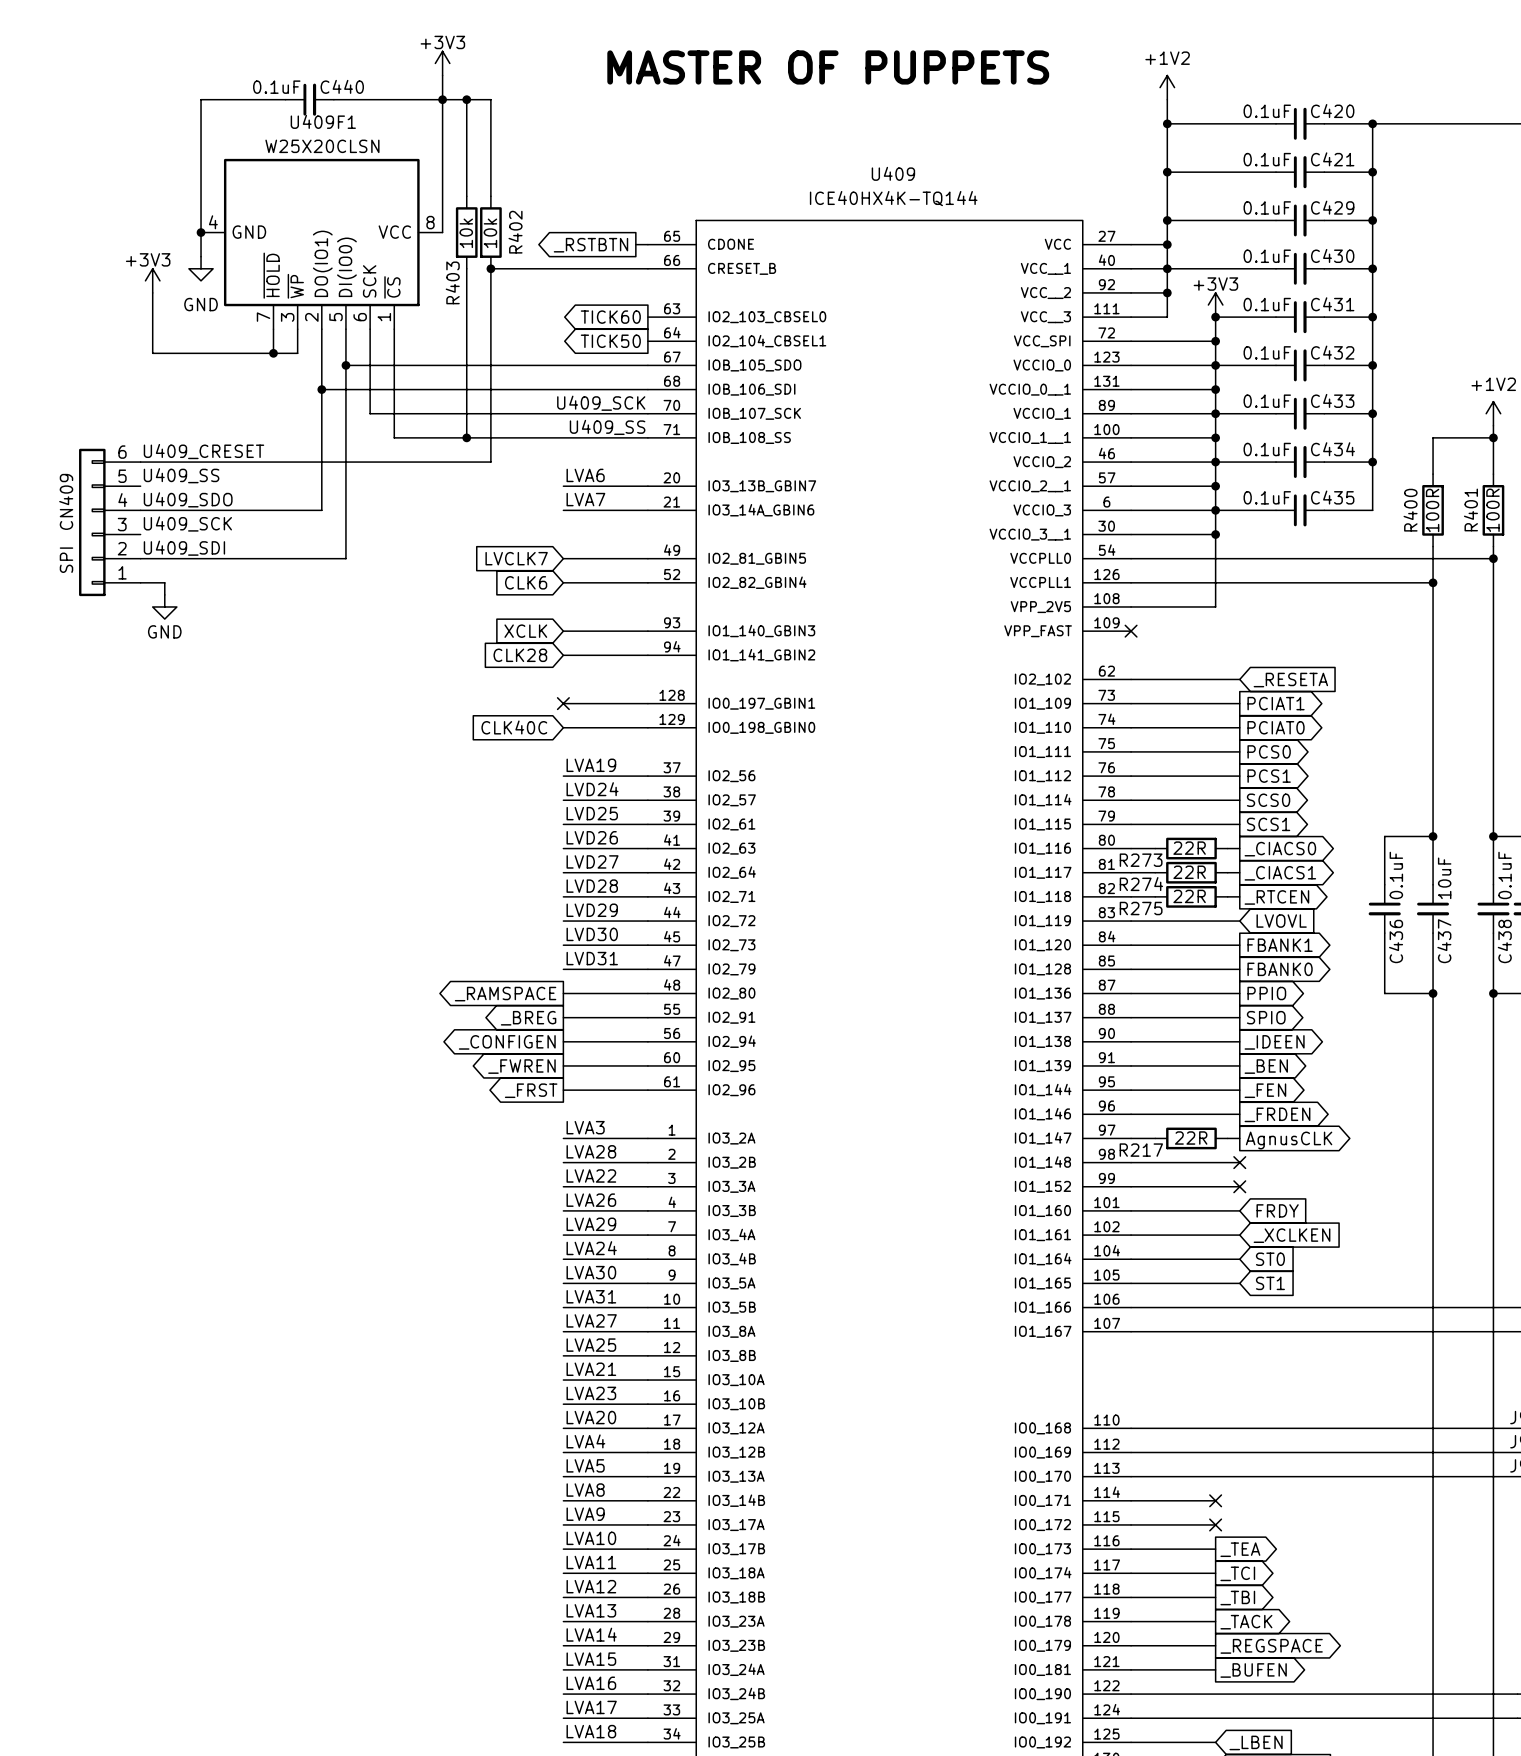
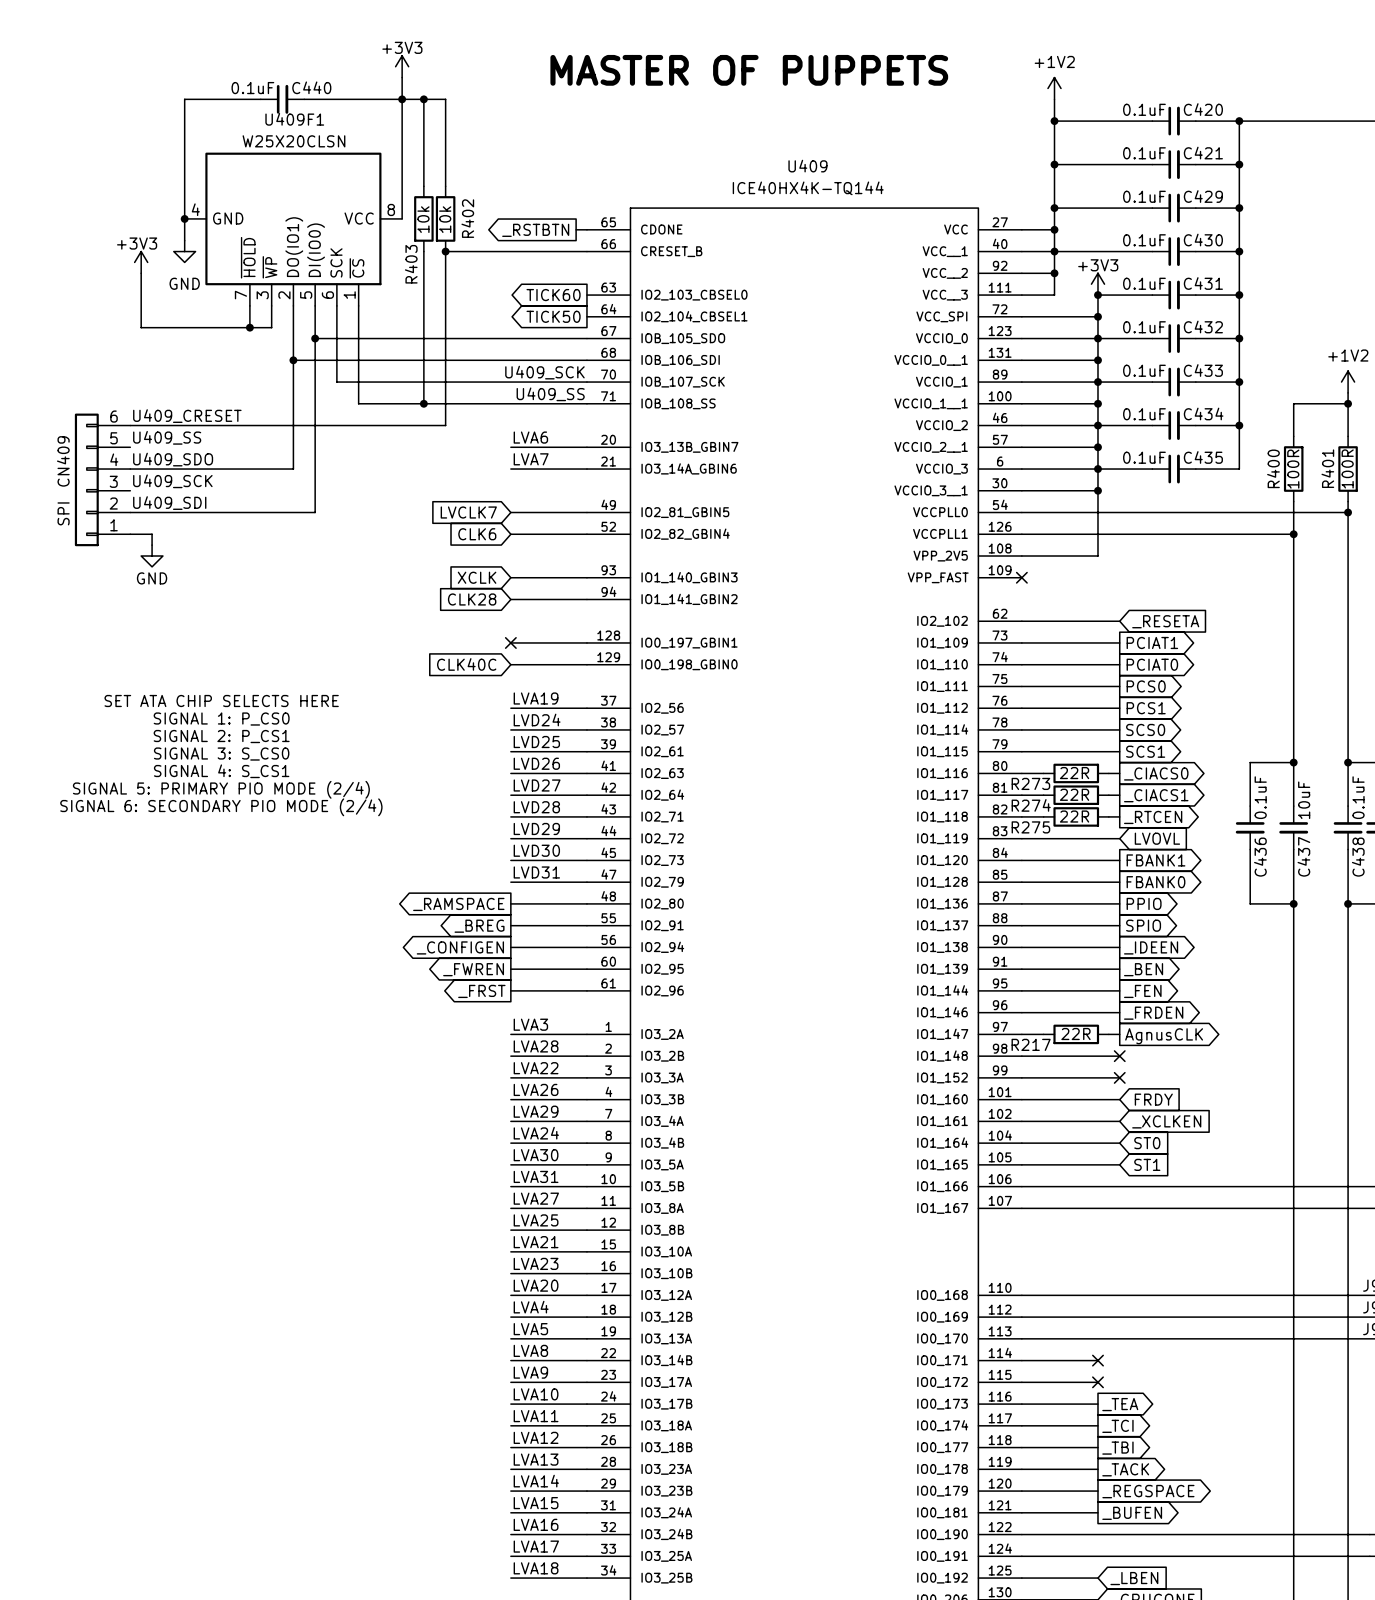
text: none -> SET ATA CHIP SELECTS HERE (221, 701)
text: none -> SIGNAL 1: P_CS0 (221, 719)
text: none -> SIGNAL 2: P_CS1 (221, 736)
text: none -> SIGNAL 3: S_CS0 (221, 754)
text: none -> SIGNAL 4: S_CS1 (221, 771)
text: none -> SIGNAL 5: PRIMARY PIO MODE (2/4) (221, 789)
text: none -> SIGNAL 6: SECONDARY PIO MODE (2/4) (221, 807)

